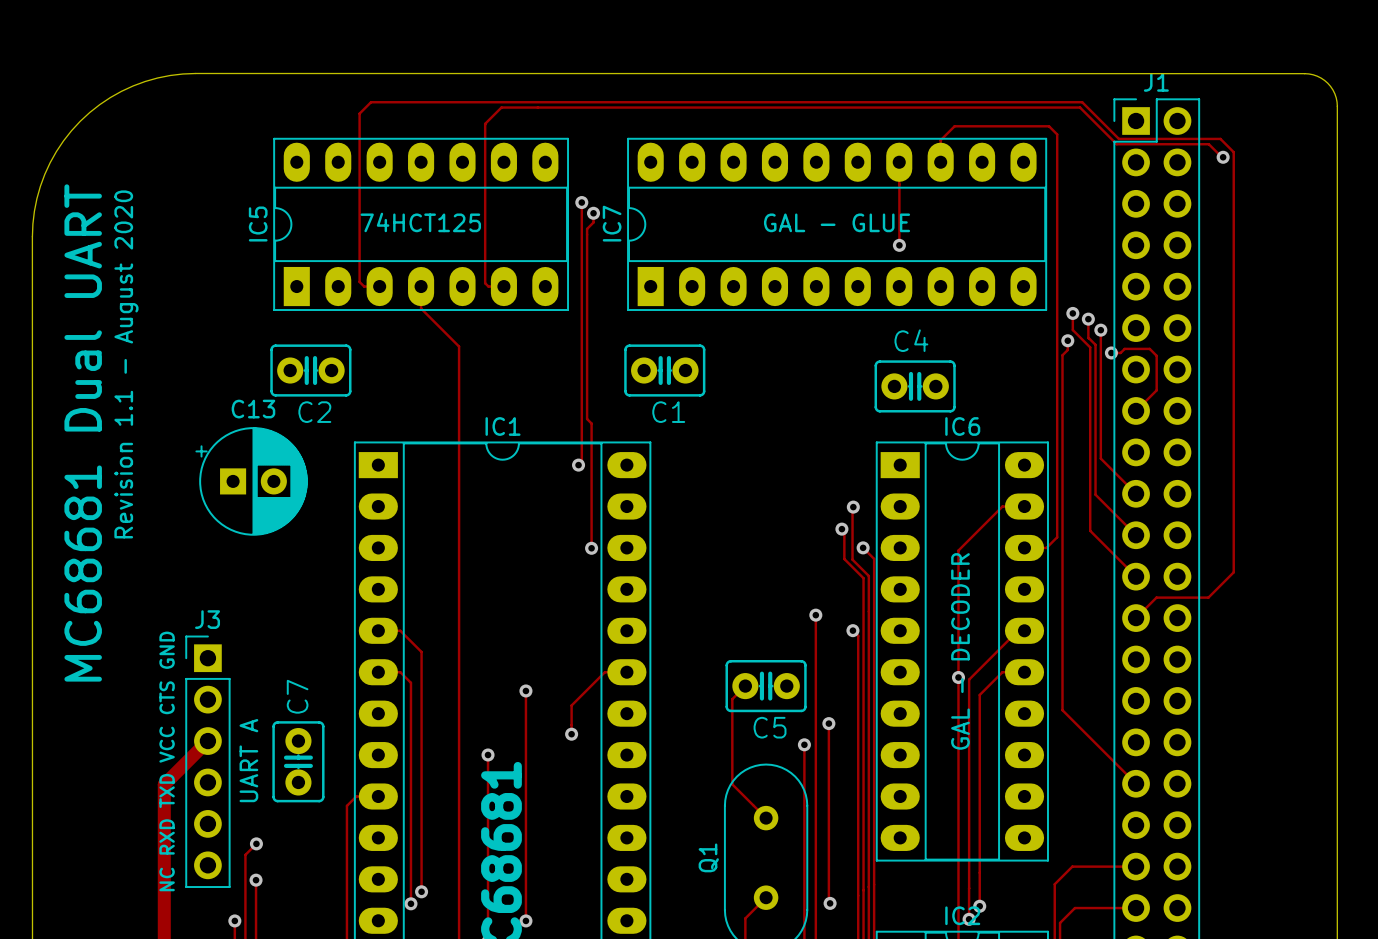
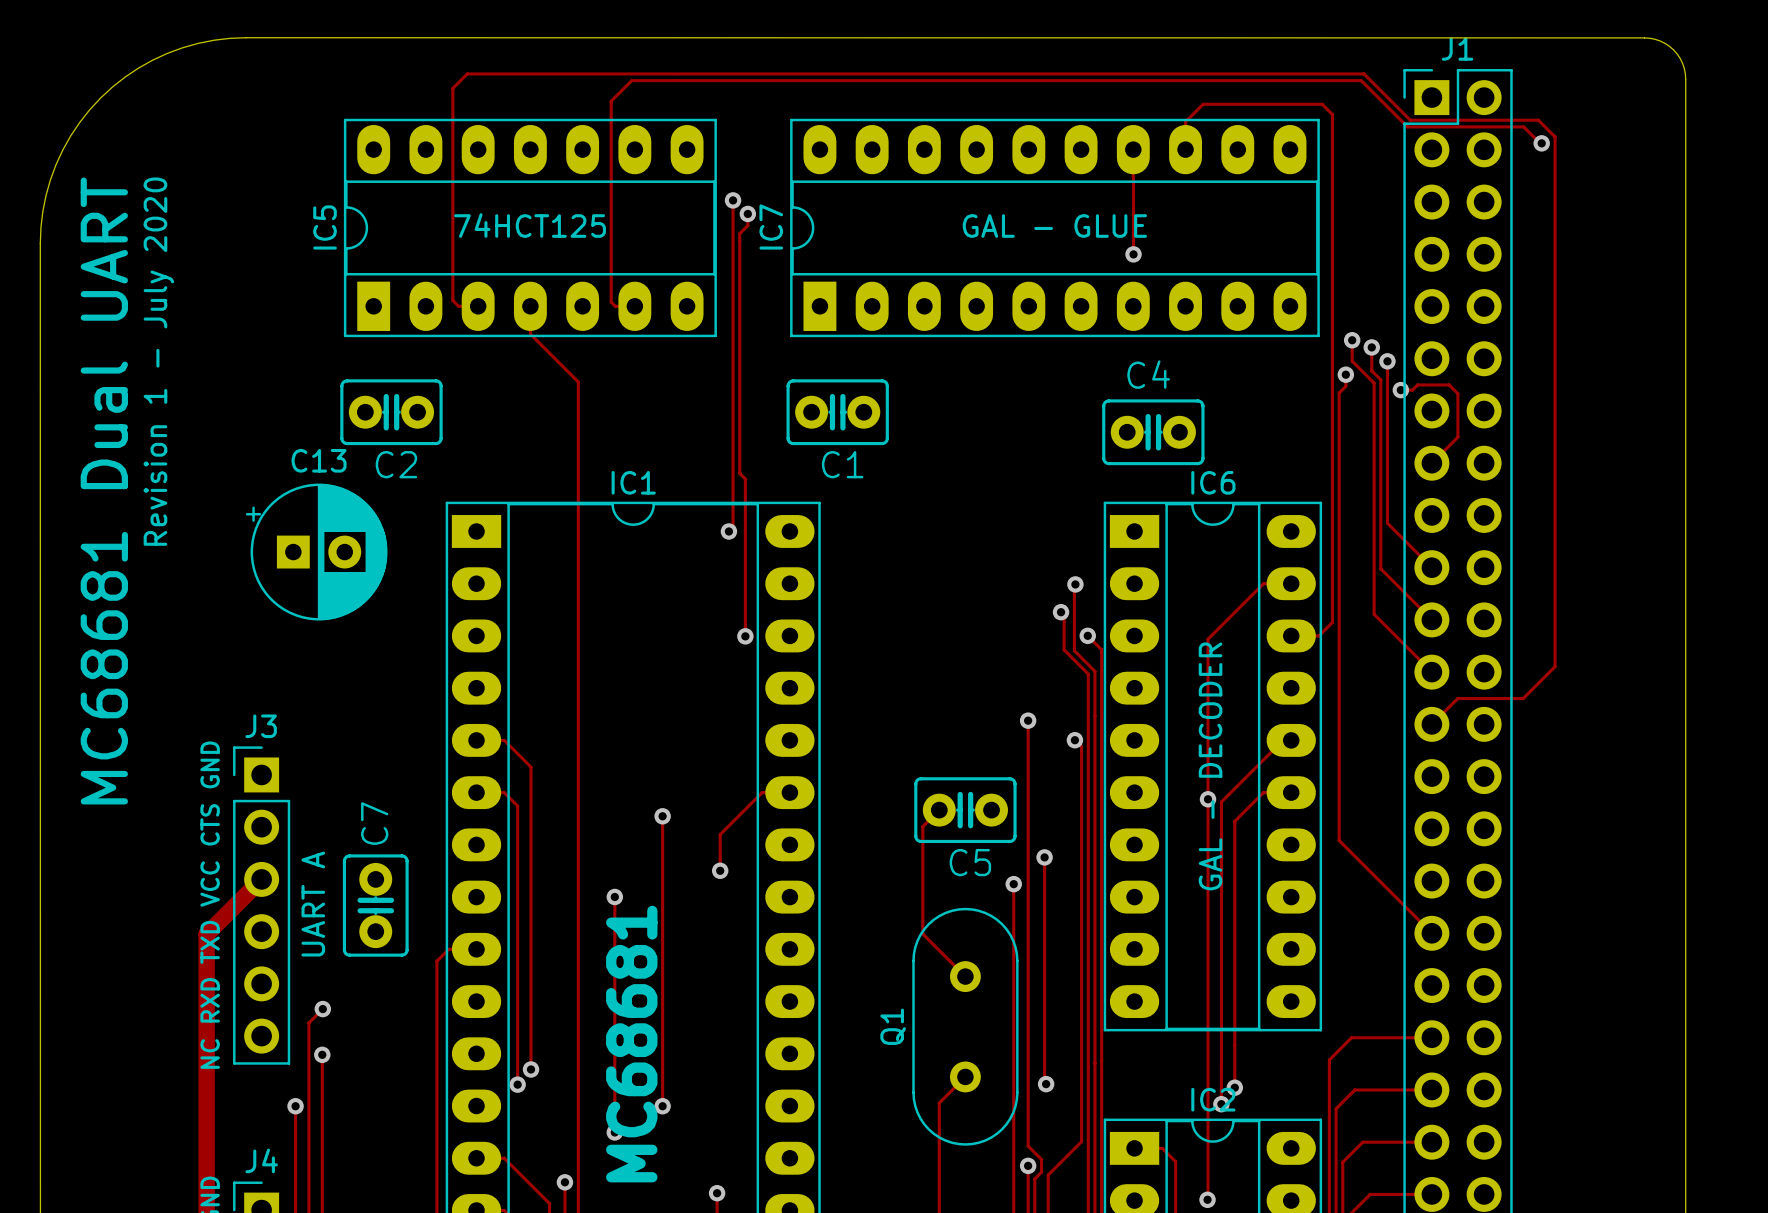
text: Revision 1.1 - August 2020 (126, 364) -> Revision 1 - July 2020 (158, 361)

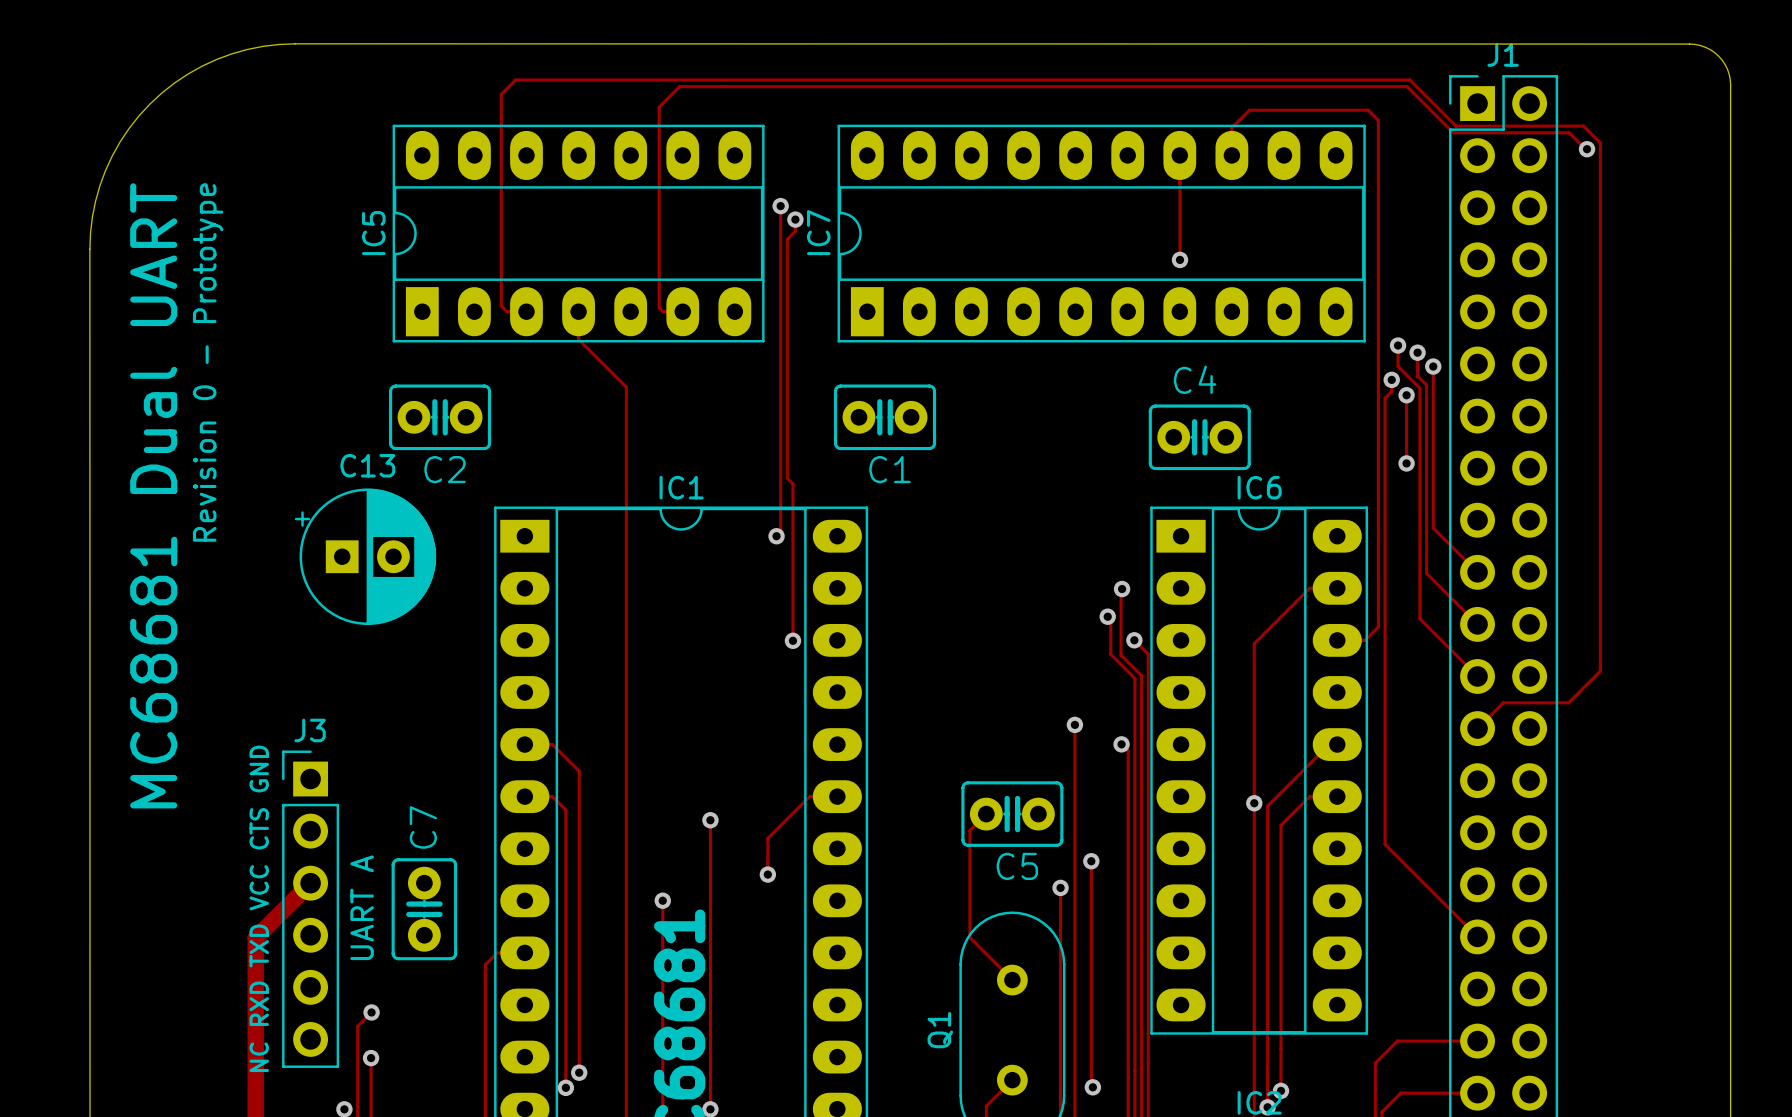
text: 74HCT125 (530, 225) -> none
text: GAL - GLUE (1054, 226) -> none
text: Revision 1 - July 2020 (158, 361) -> Revision 0 - Prototype (208, 362)
track: none -> (1406, 395) (1406, 463)
via: none -> (1406, 395)
track: (1400, 390) (1412, 390) (1417, 384) (1449, 384) (1457, 393) (1457, 437) (1431, 463) -> none
via: (1400, 390) -> none
via: none -> (1406, 463)
text: GAL - DECODER (1210, 766) -> none

